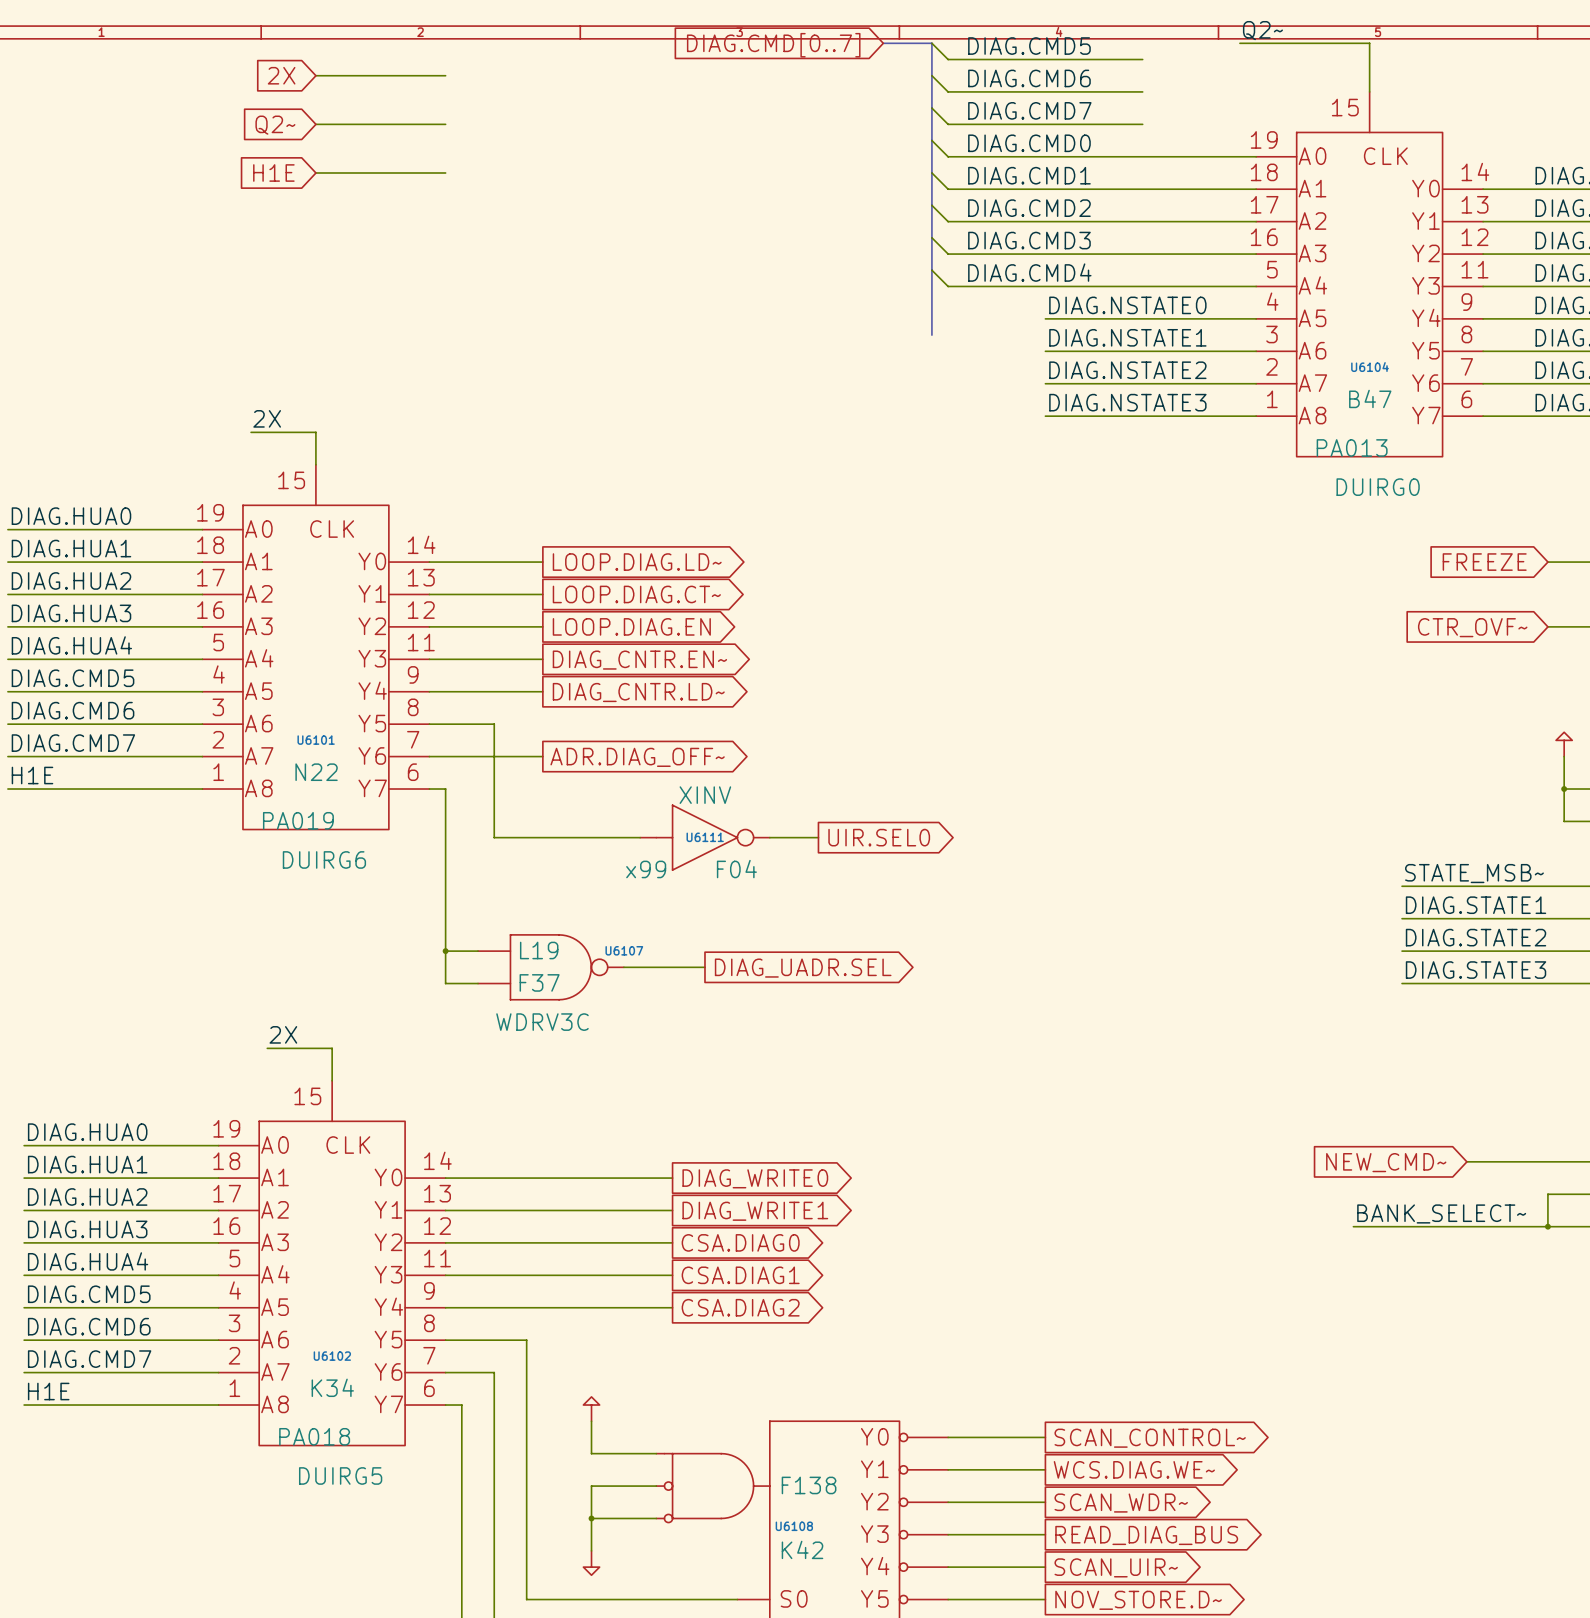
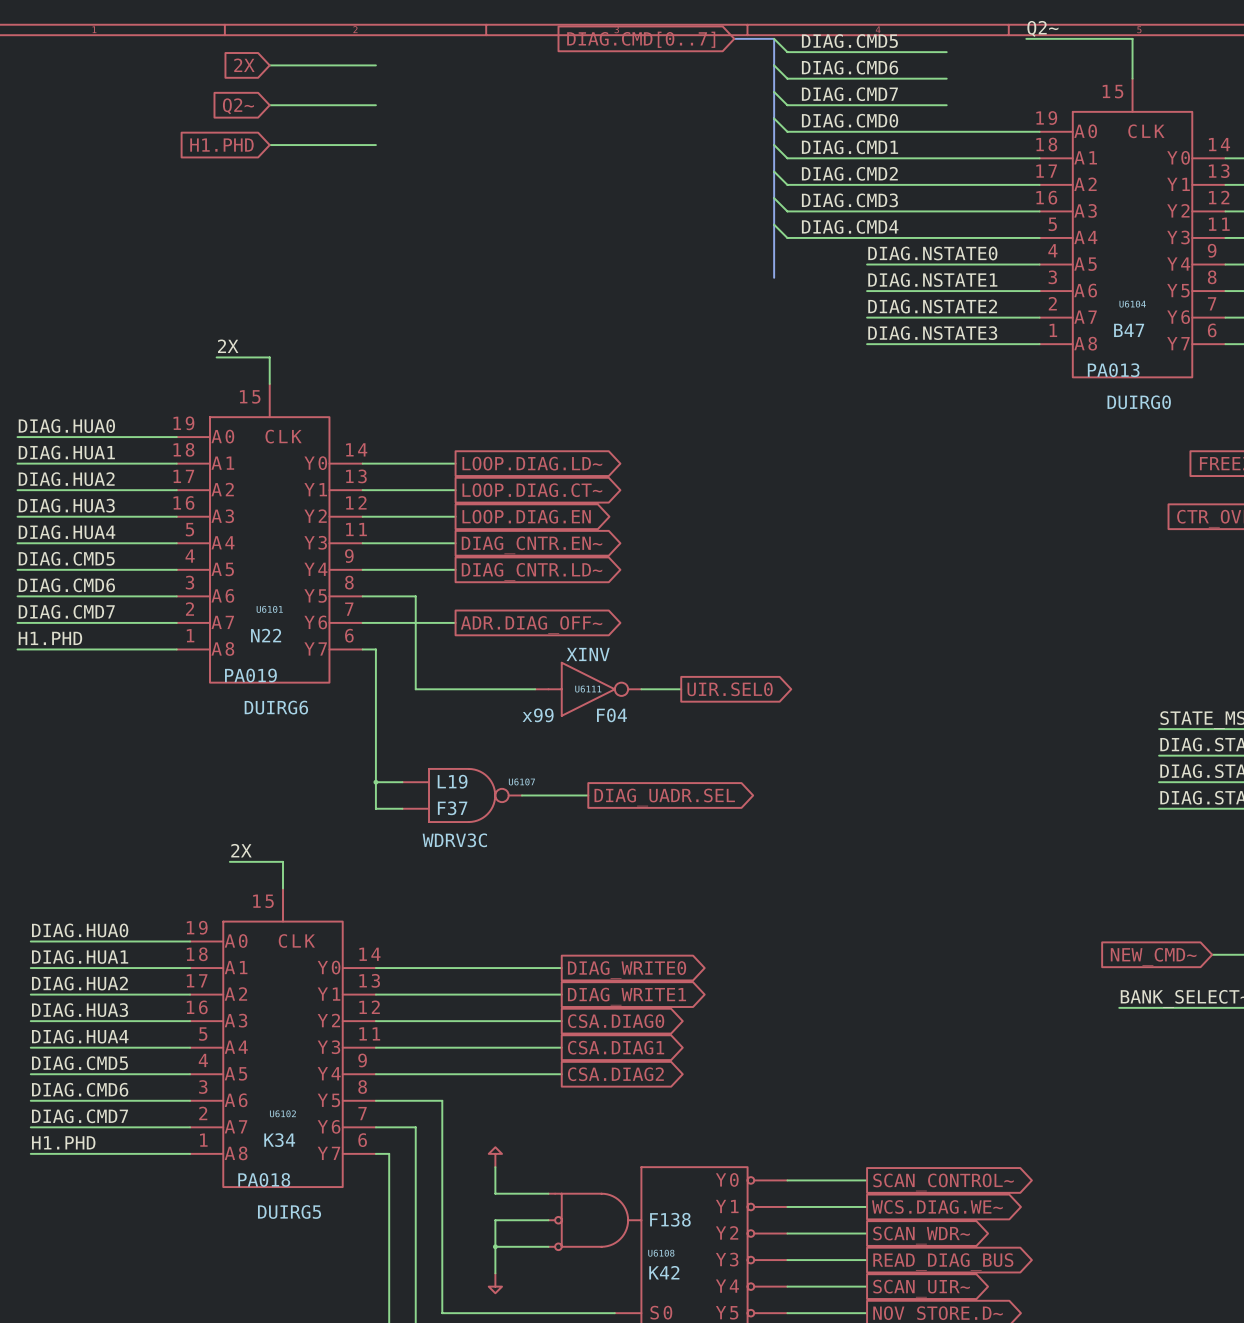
global label: H1E (273, 172) -> H1.PHD (221, 145)
label: H1E (32, 775) -> H1.PHD (50, 638)
label: H1E (48, 1391) -> H1.PHD (63, 1142)

